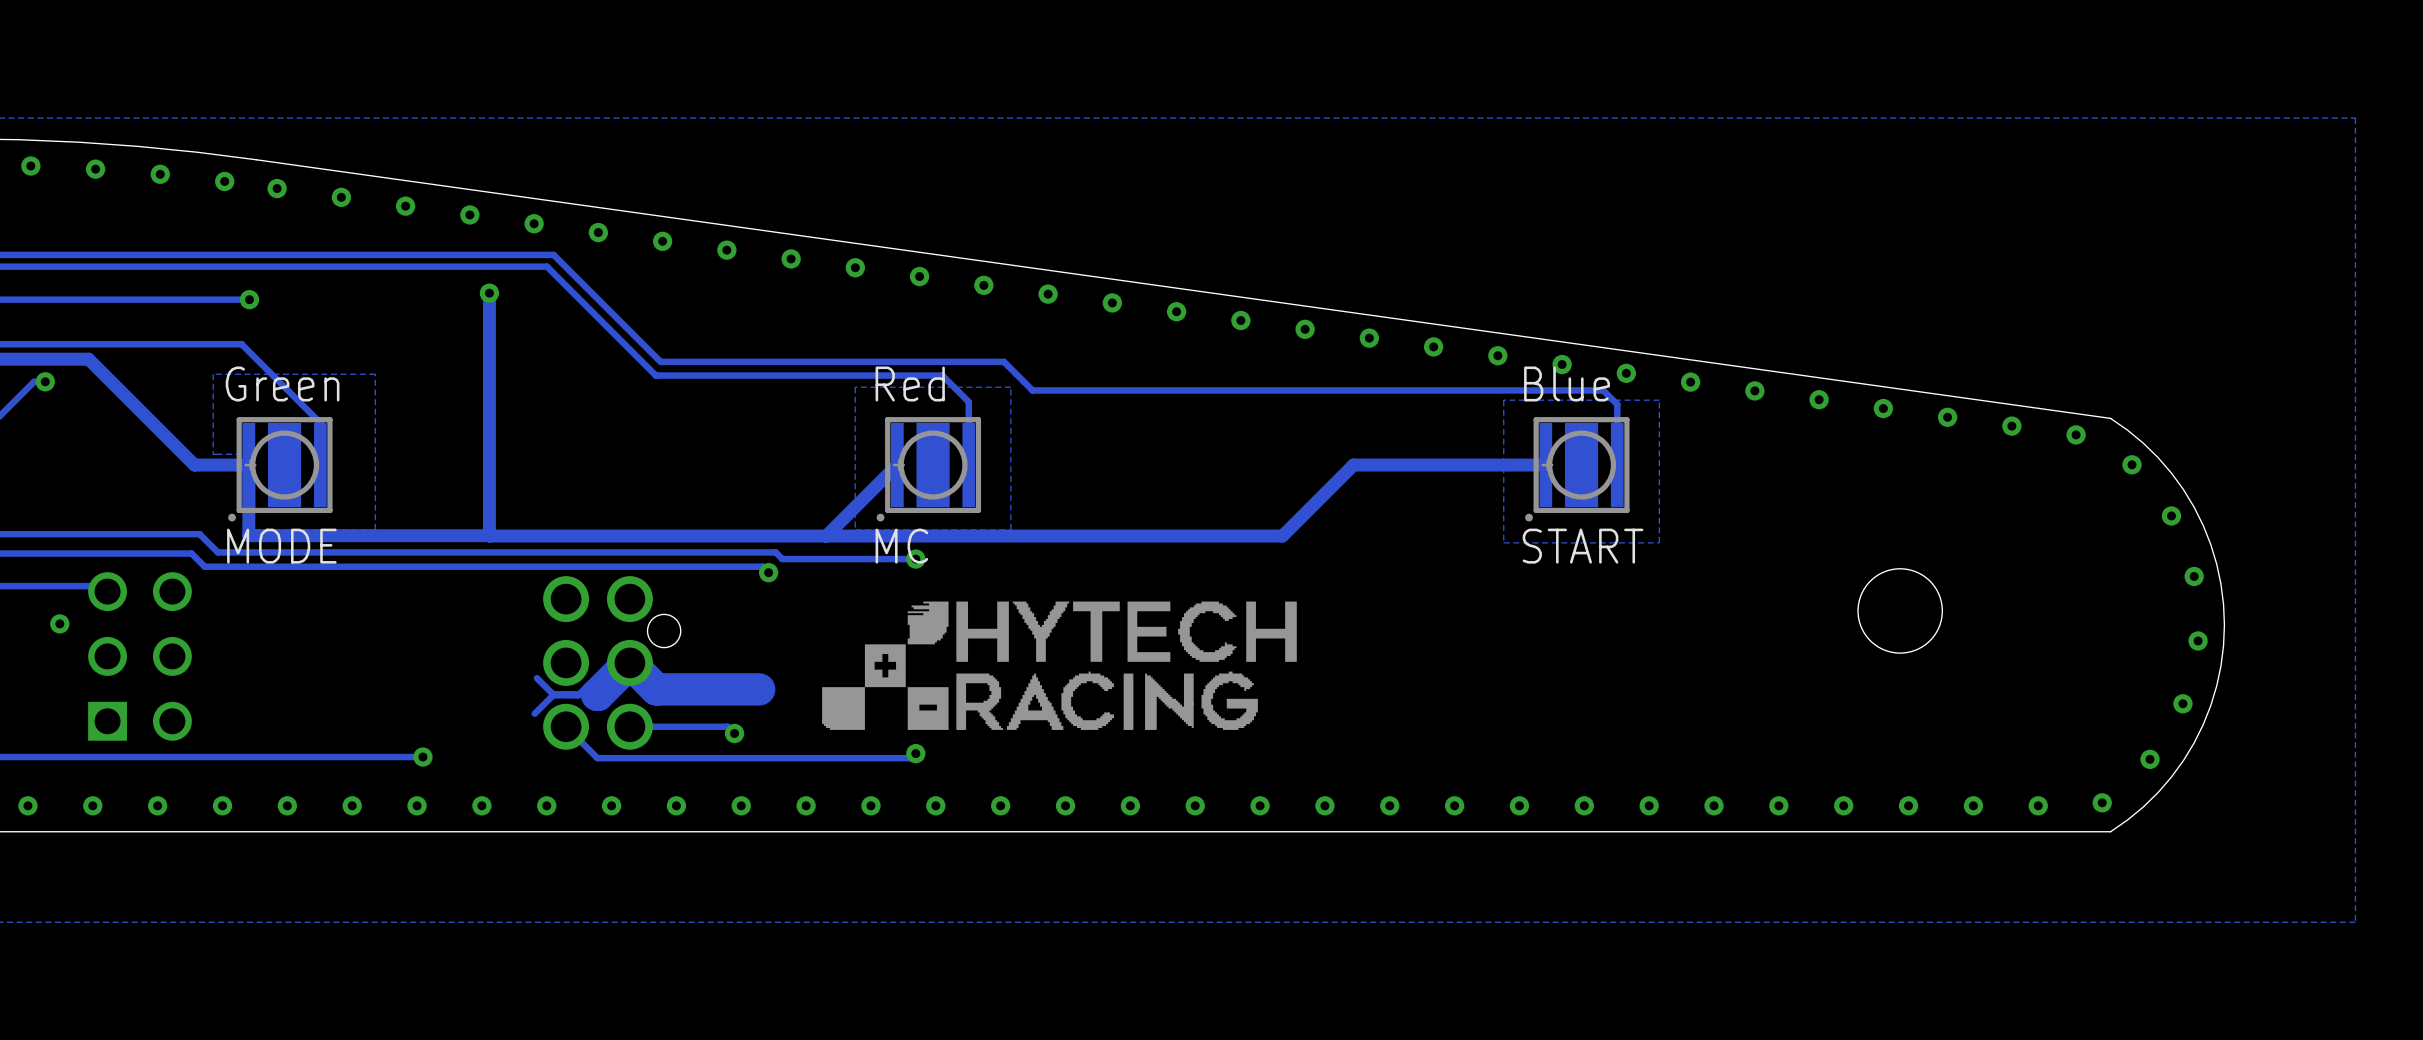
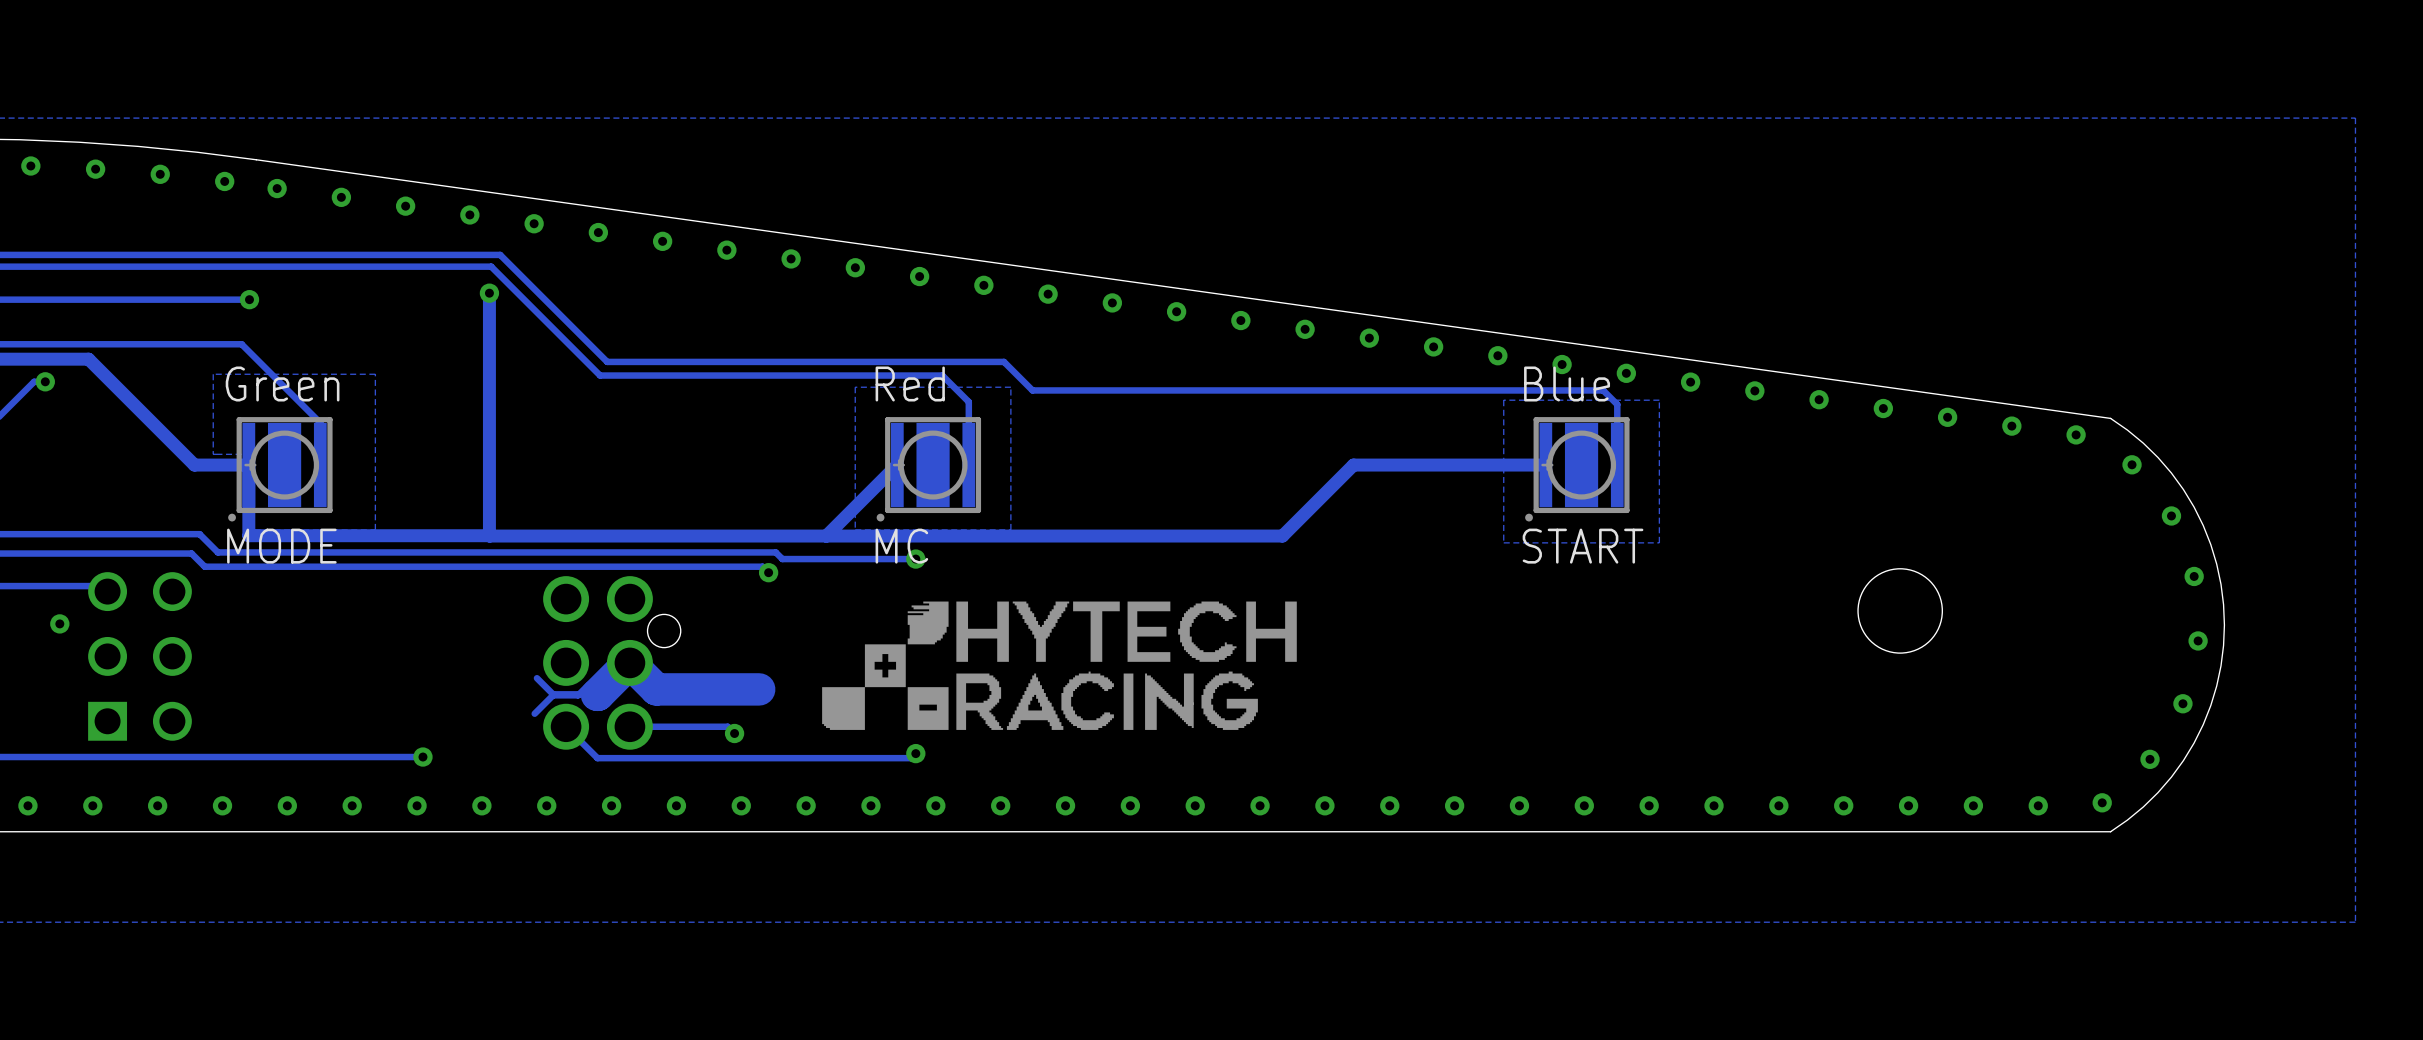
track: (500, 254) (553, 254) (660, 361) -> (500, 254) (607, 361) (660, 361)
track: (491, 266) (547, 266) (655, 375) -> (491, 266) (600, 375) (655, 375)

